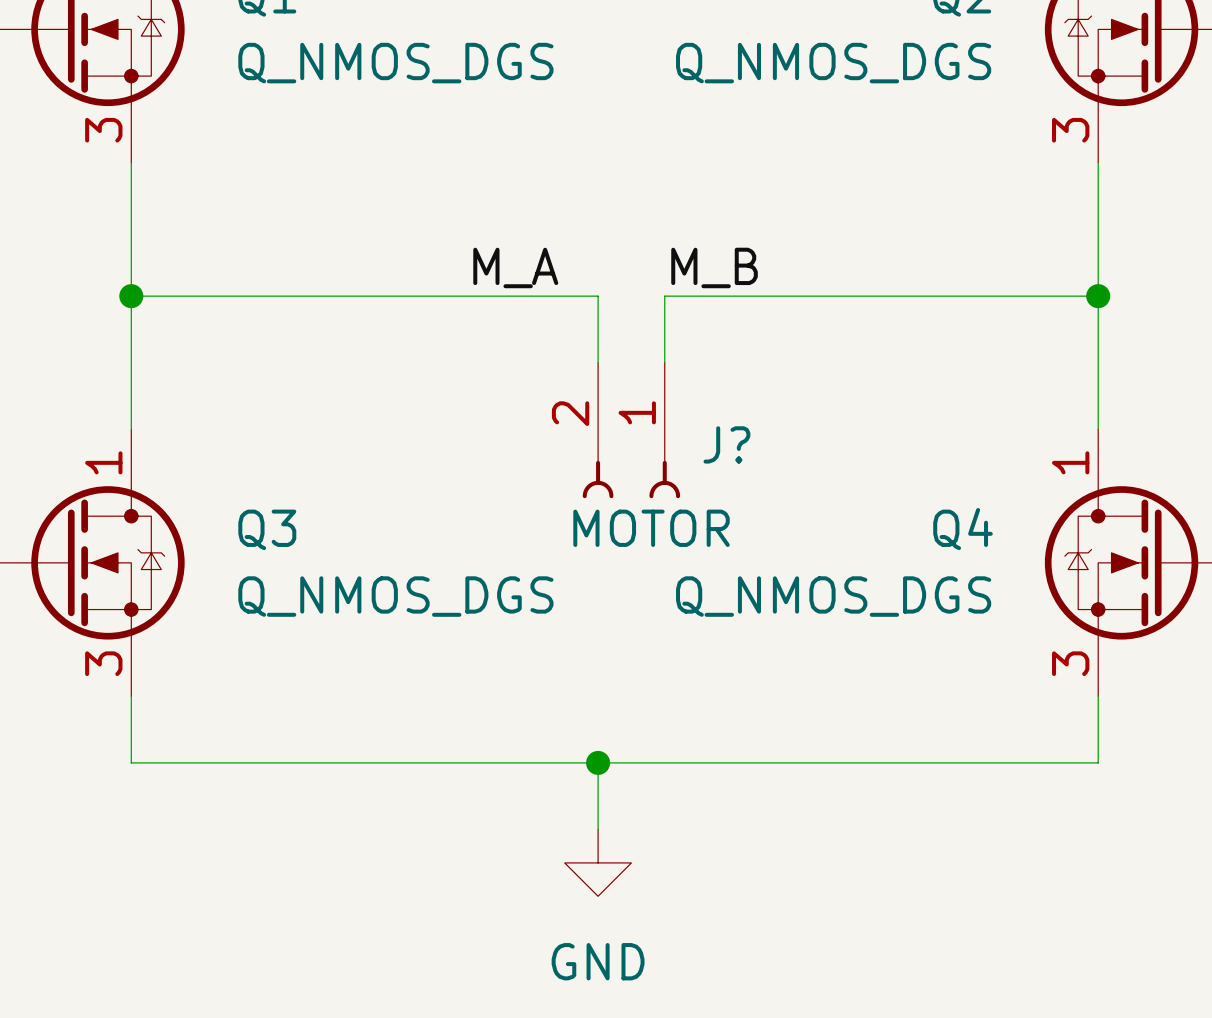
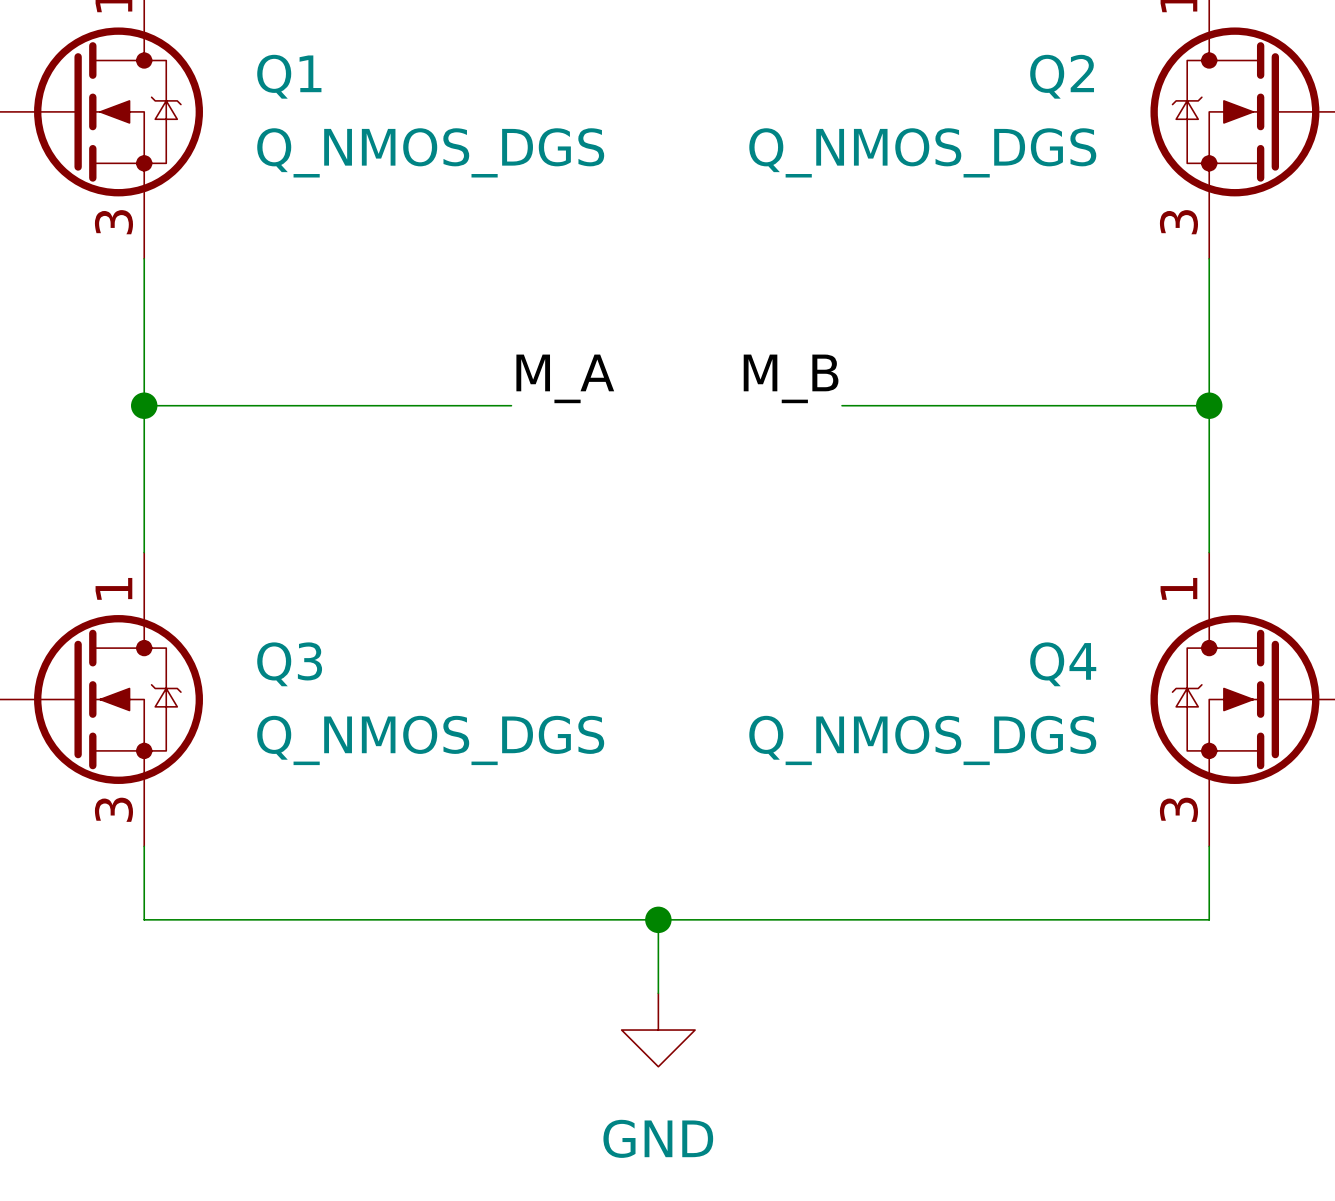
wire: (464, 296) (598, 296) (598, 362) -> none
wire: (764, 296) (664, 296) (664, 362) -> none
J?: MOTOR (631, 430) -> none

